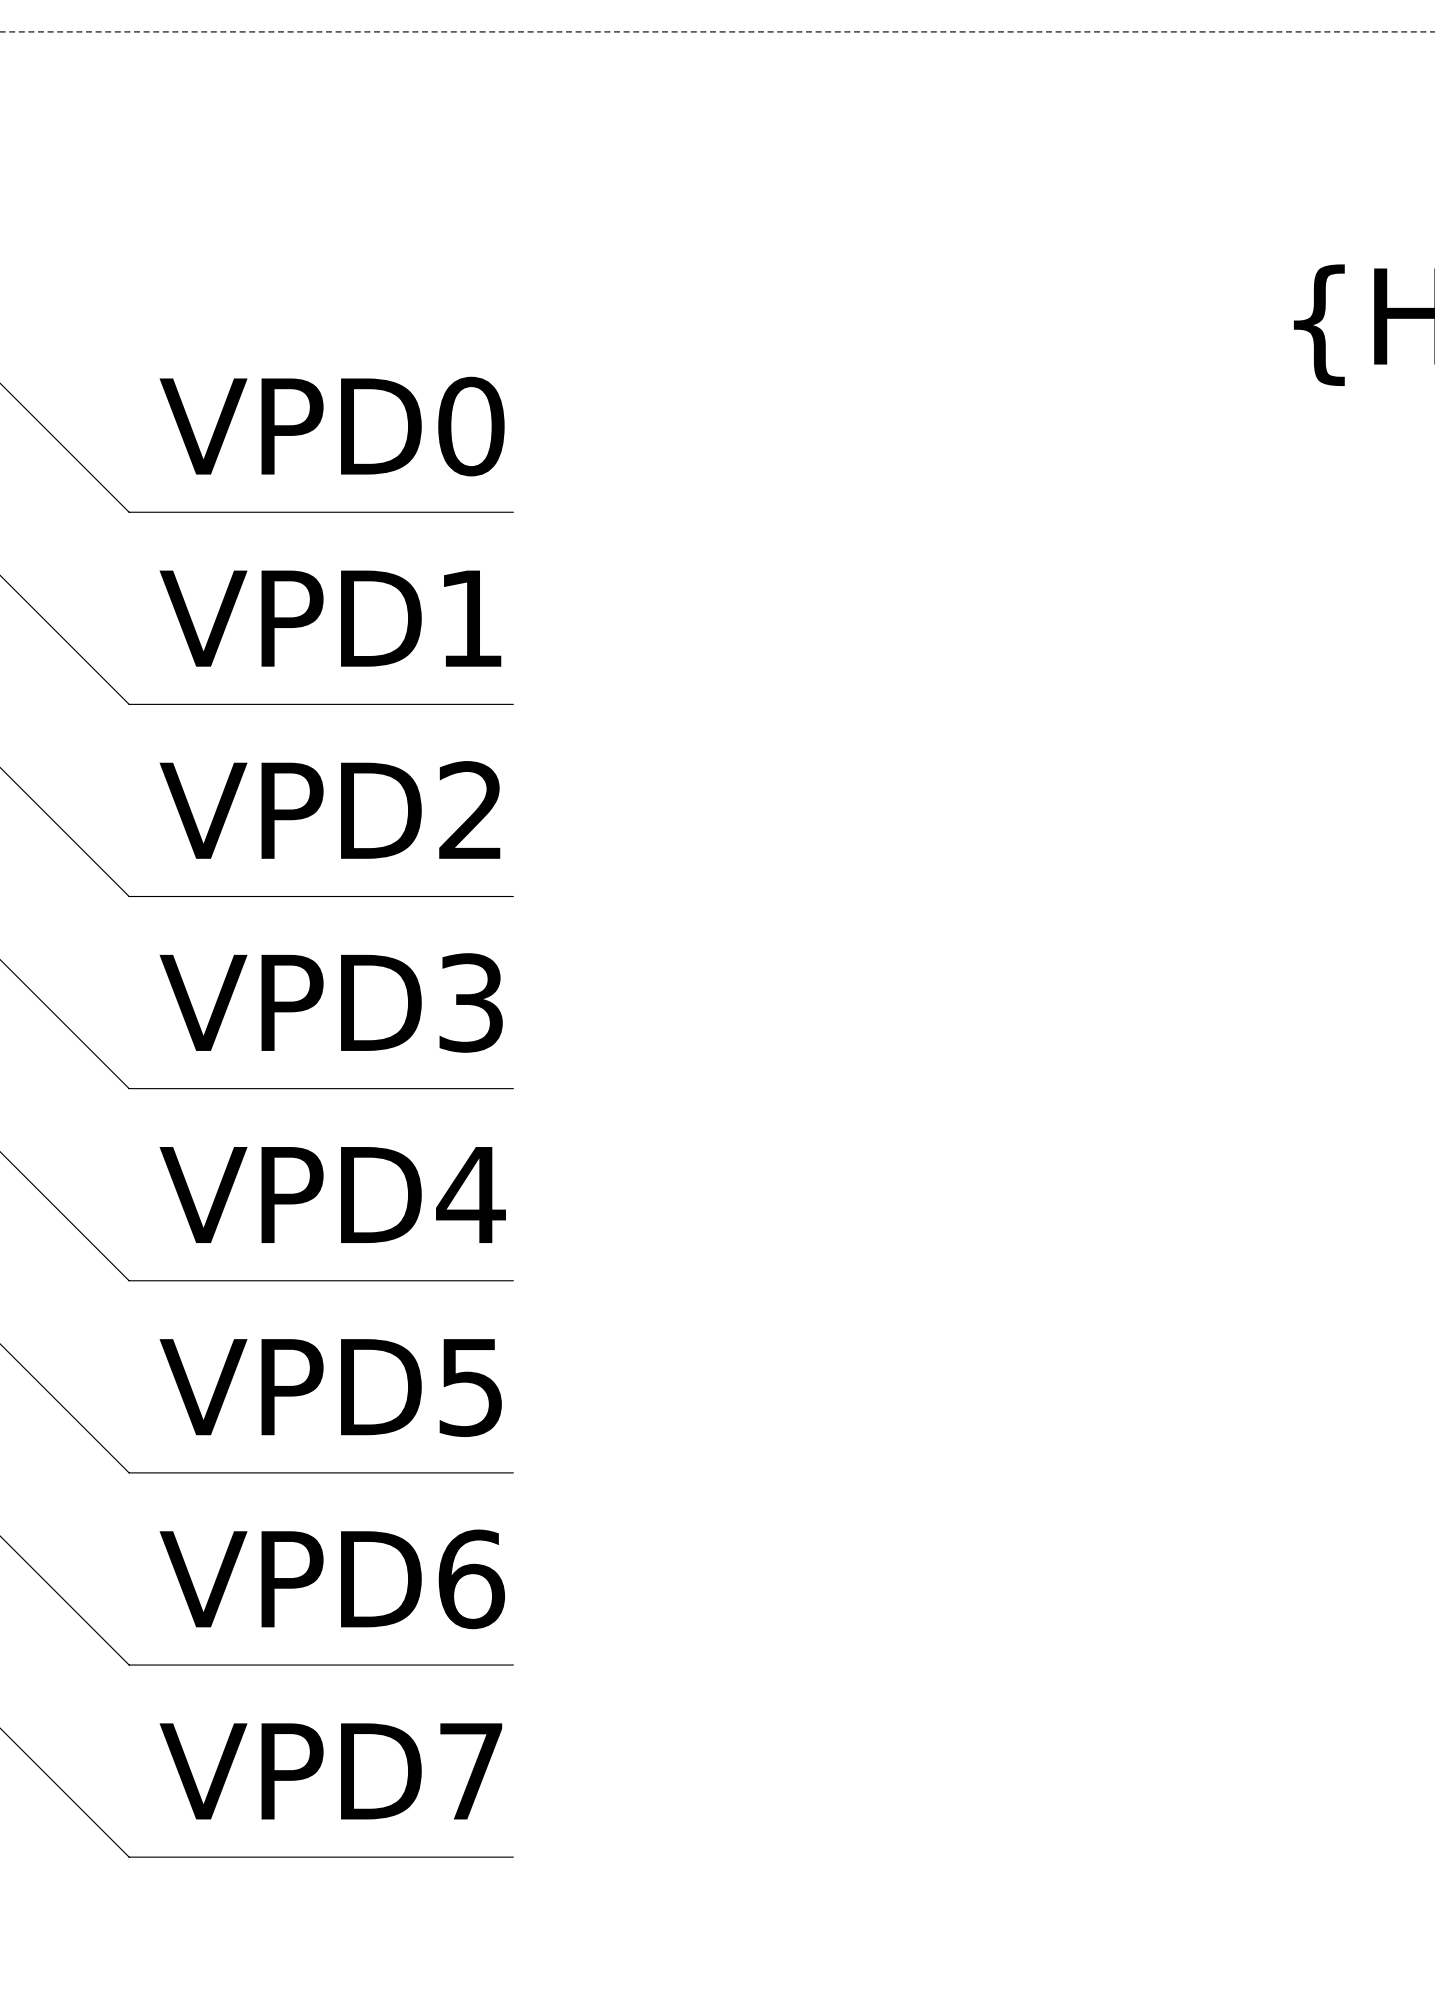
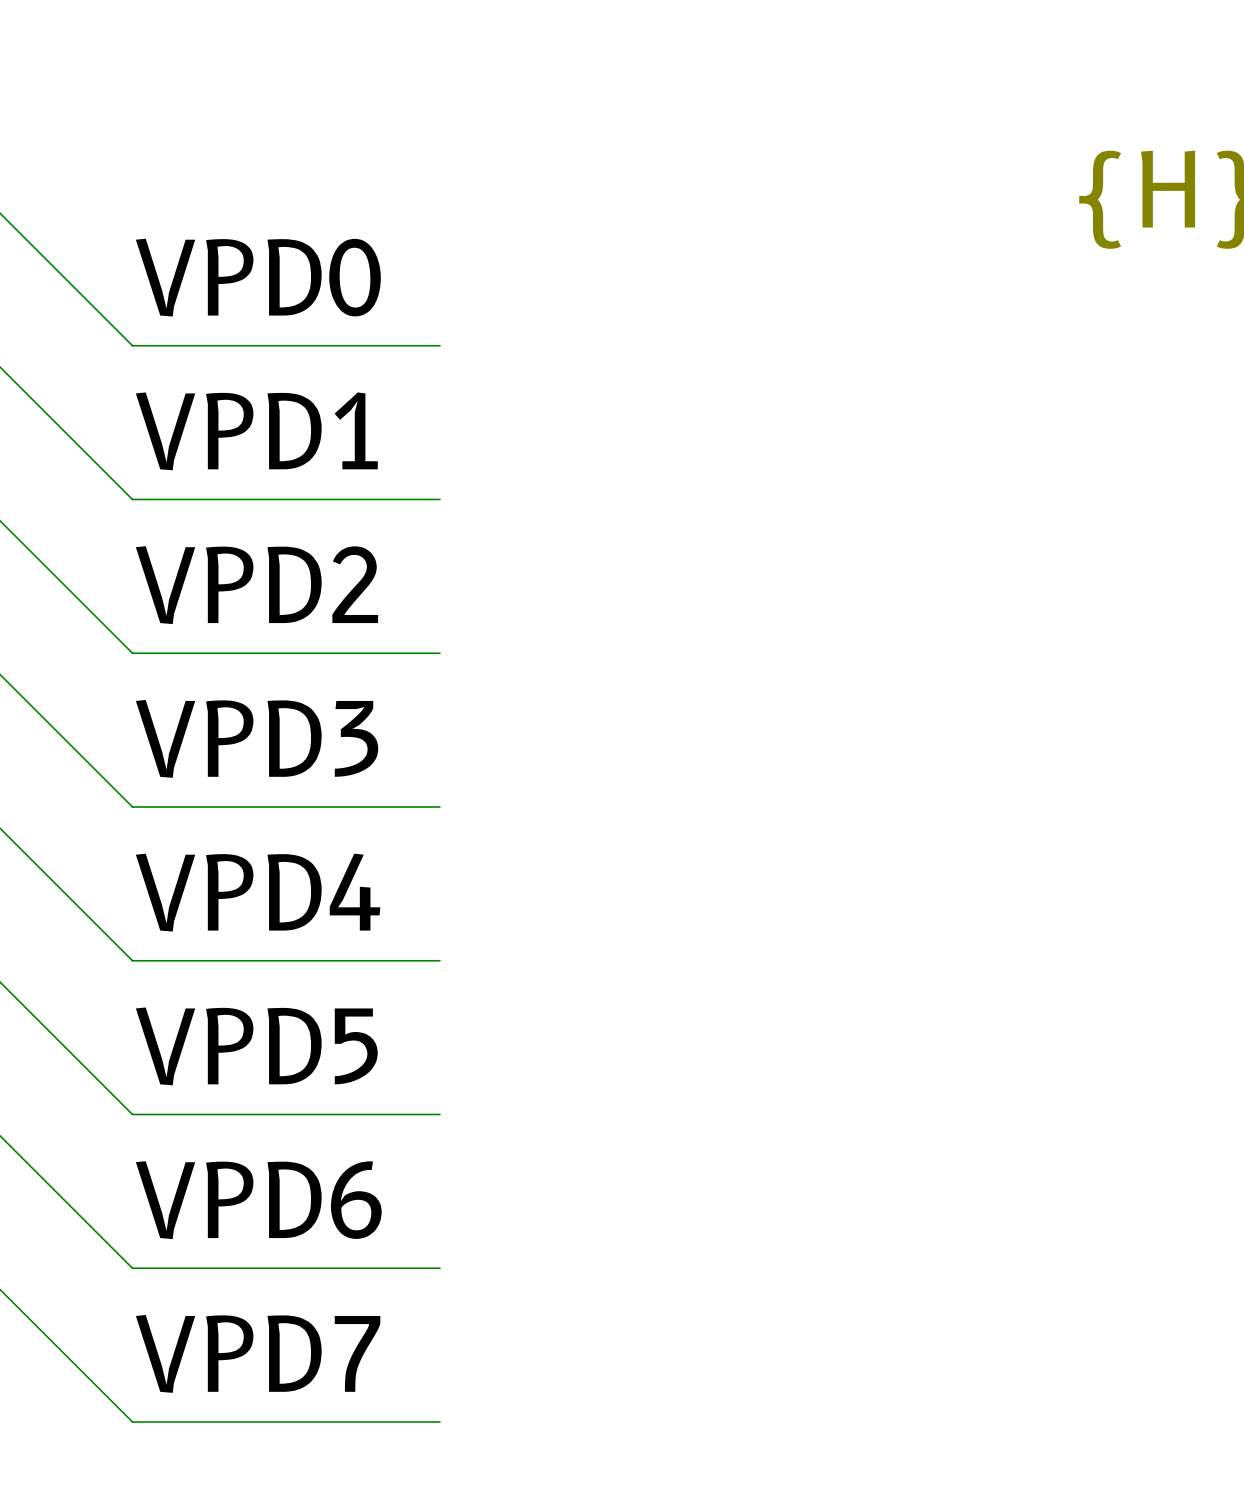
label position: VPD0 (332, 426) -> VPD0 (258, 277)
label position: VPD1 (330, 618) -> VPD1 (256, 431)
label position: VPD2 (329, 809) -> VPD2 (256, 585)
label position: VPD3 (331, 1002) -> VPD3 (257, 738)
label position: VPD4 (332, 1195) -> VPD4 (258, 892)
label position: VPD5 (330, 1388) -> VPD5 (256, 1046)
label position: VPD6 (332, 1579) -> VPD6 (258, 1200)
label position: VPD7 (330, 1771) -> VPD7 (258, 1353)

